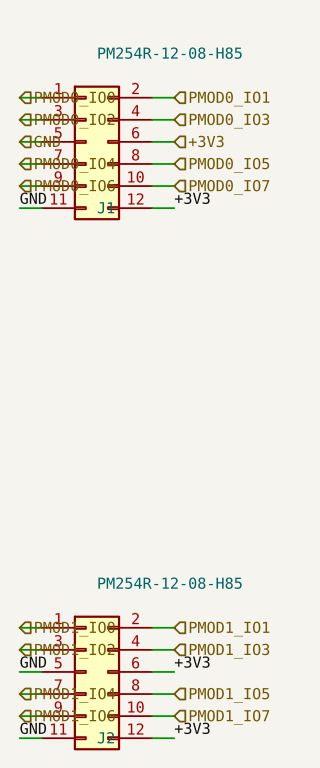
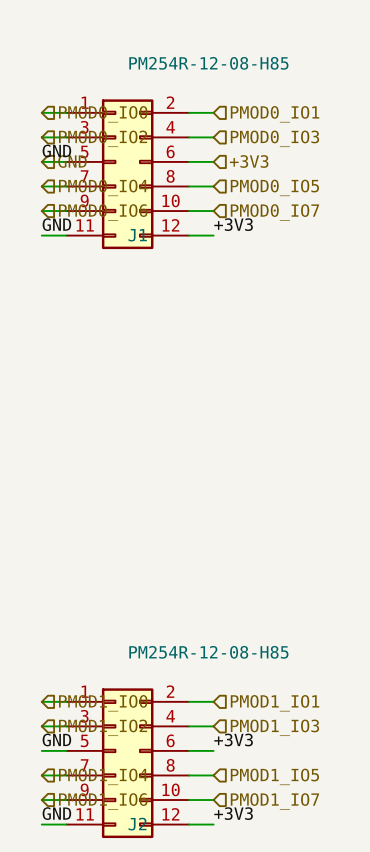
label: none -> GND (56, 151)

